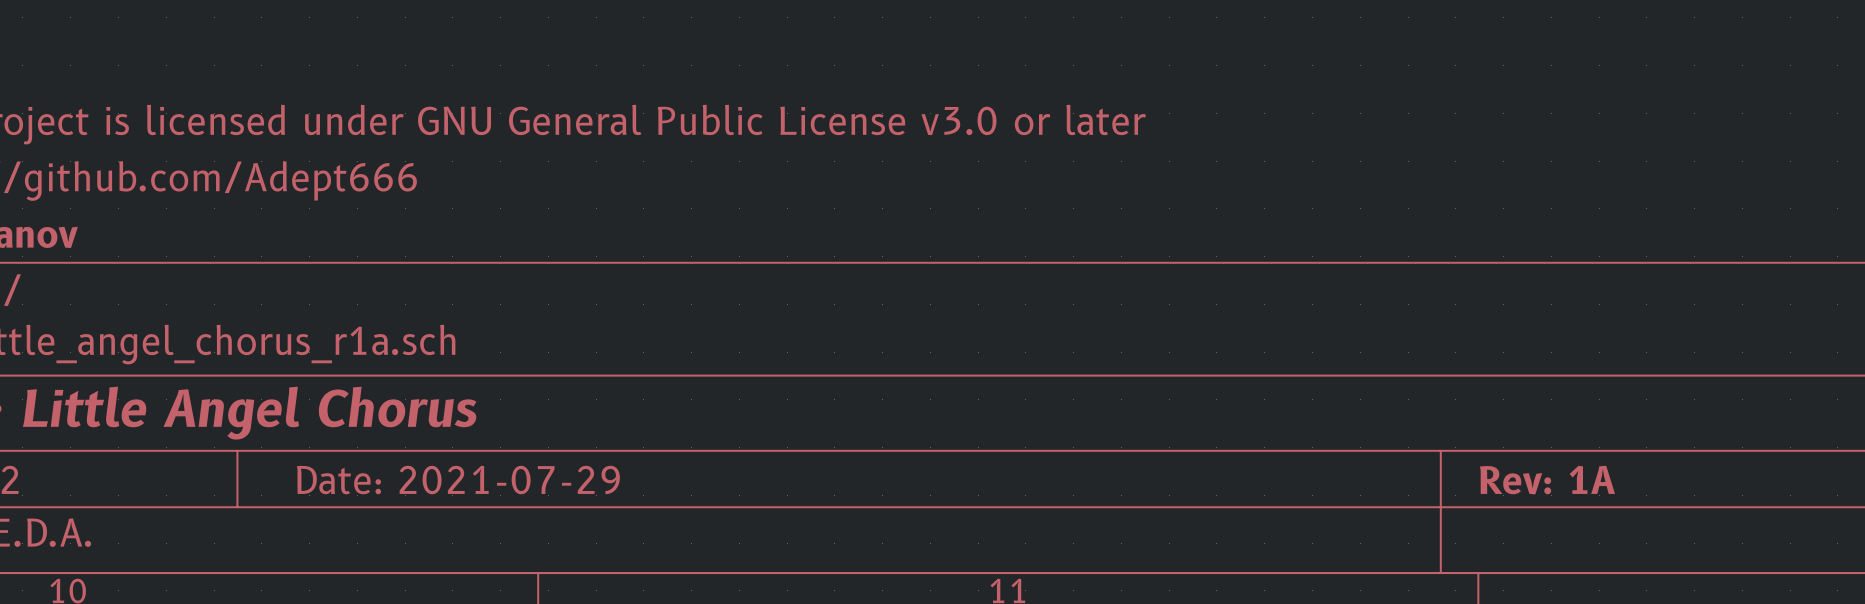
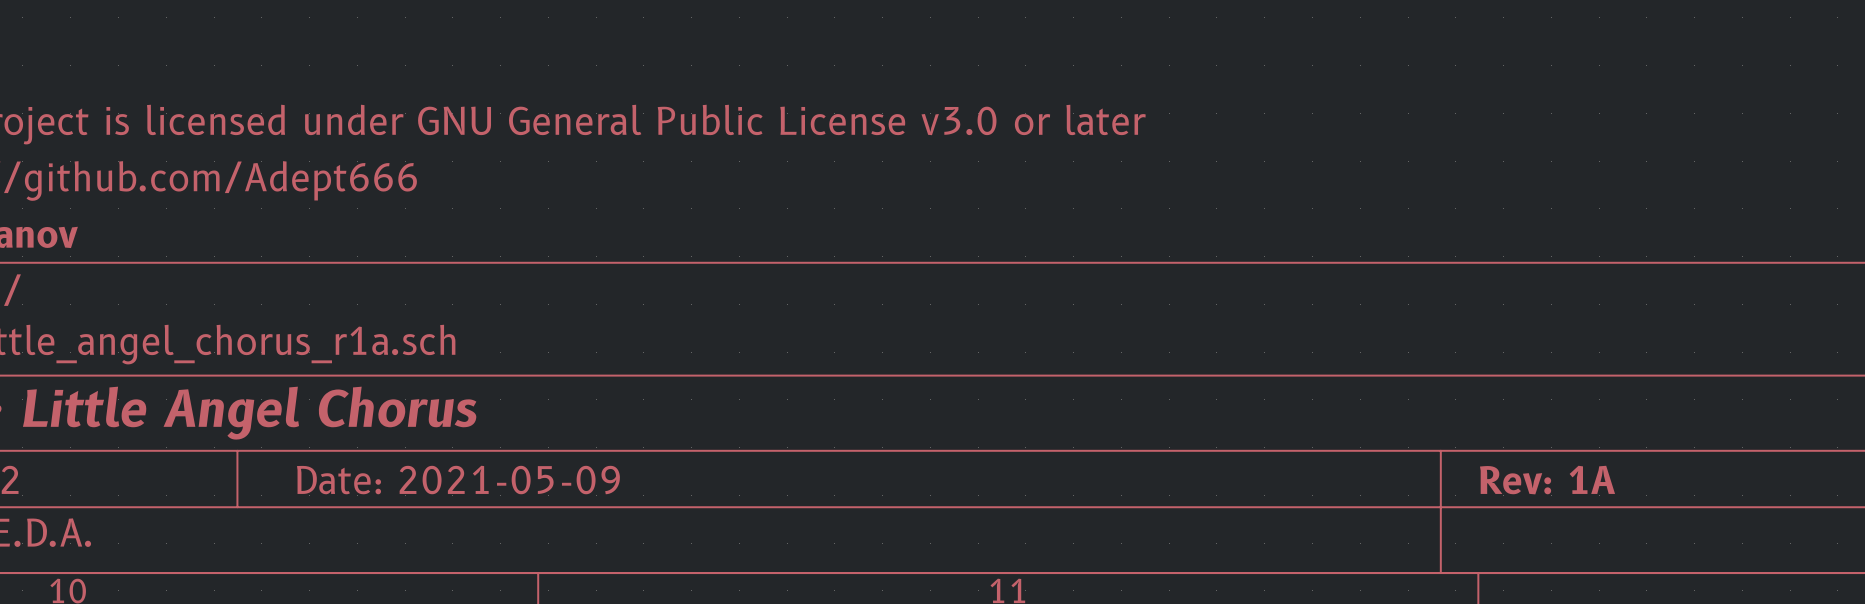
title block: Date: 2021-07-29 (458, 480) -> Date: 2021-05-09 (458, 480)

